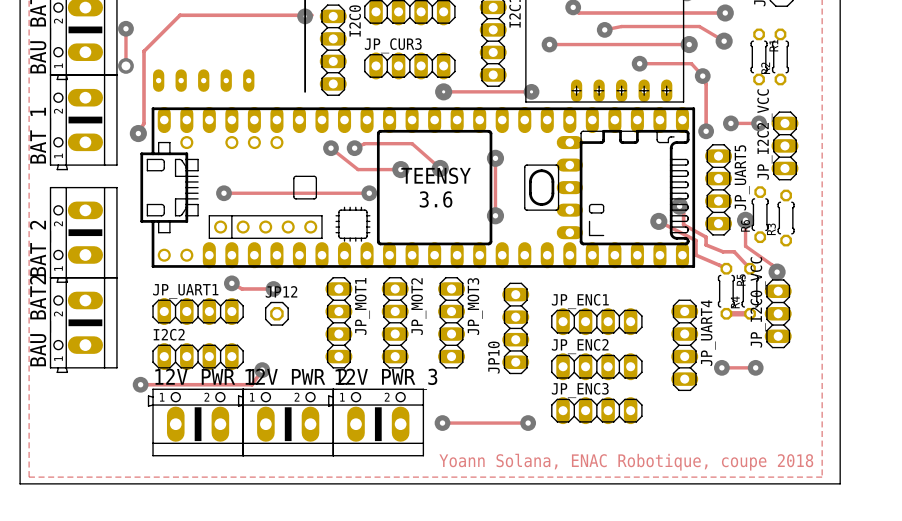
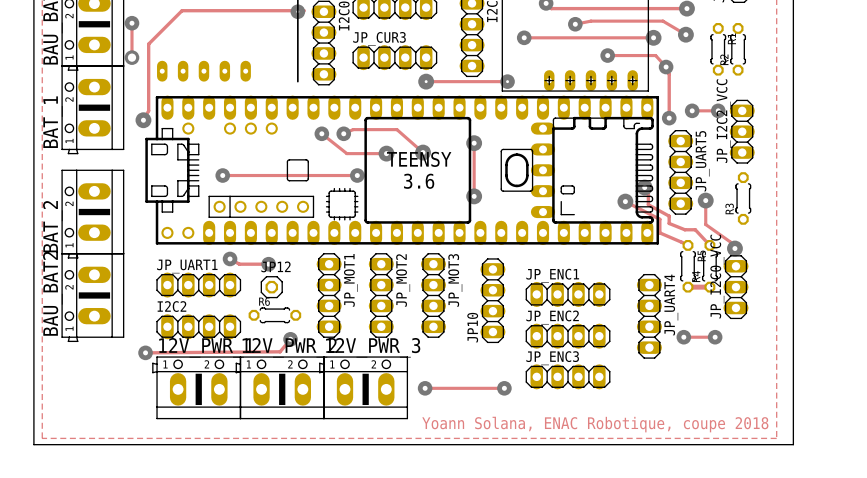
R6 rotation: 0° (760, 214) -> 90° clockwise (274, 315)
R6 position: (760, 214) -> (274, 315)
track: (262, 370) (252, 384) (140, 384) -> (290, 339) (280, 351) (145, 352)
via position: (262, 370) -> (290, 339)

